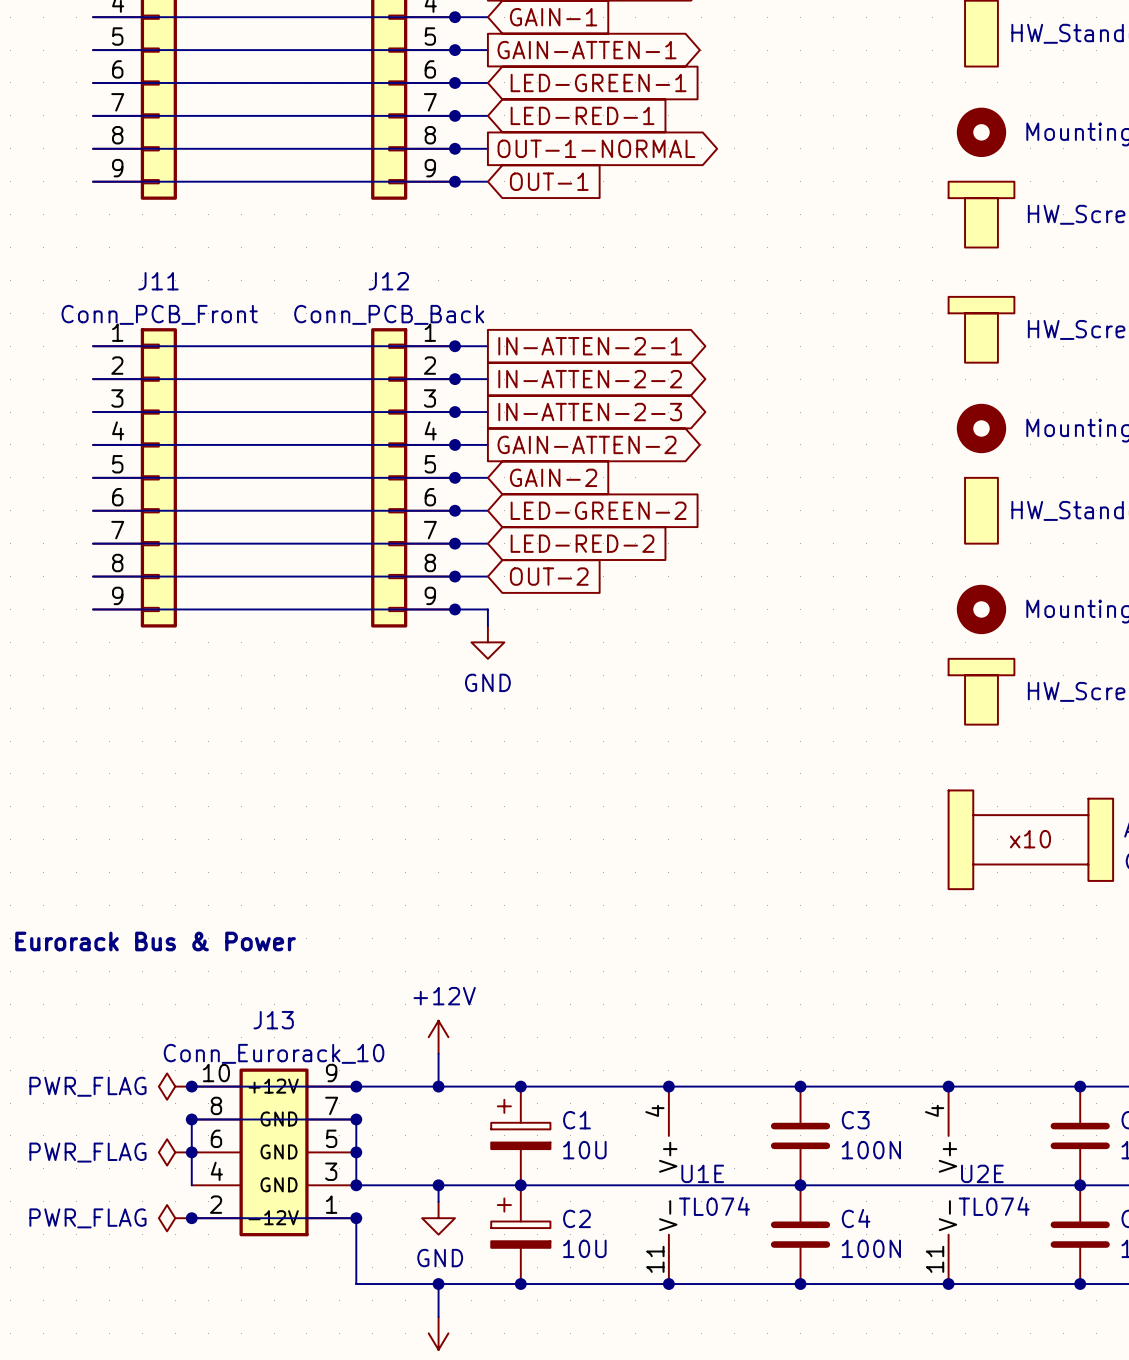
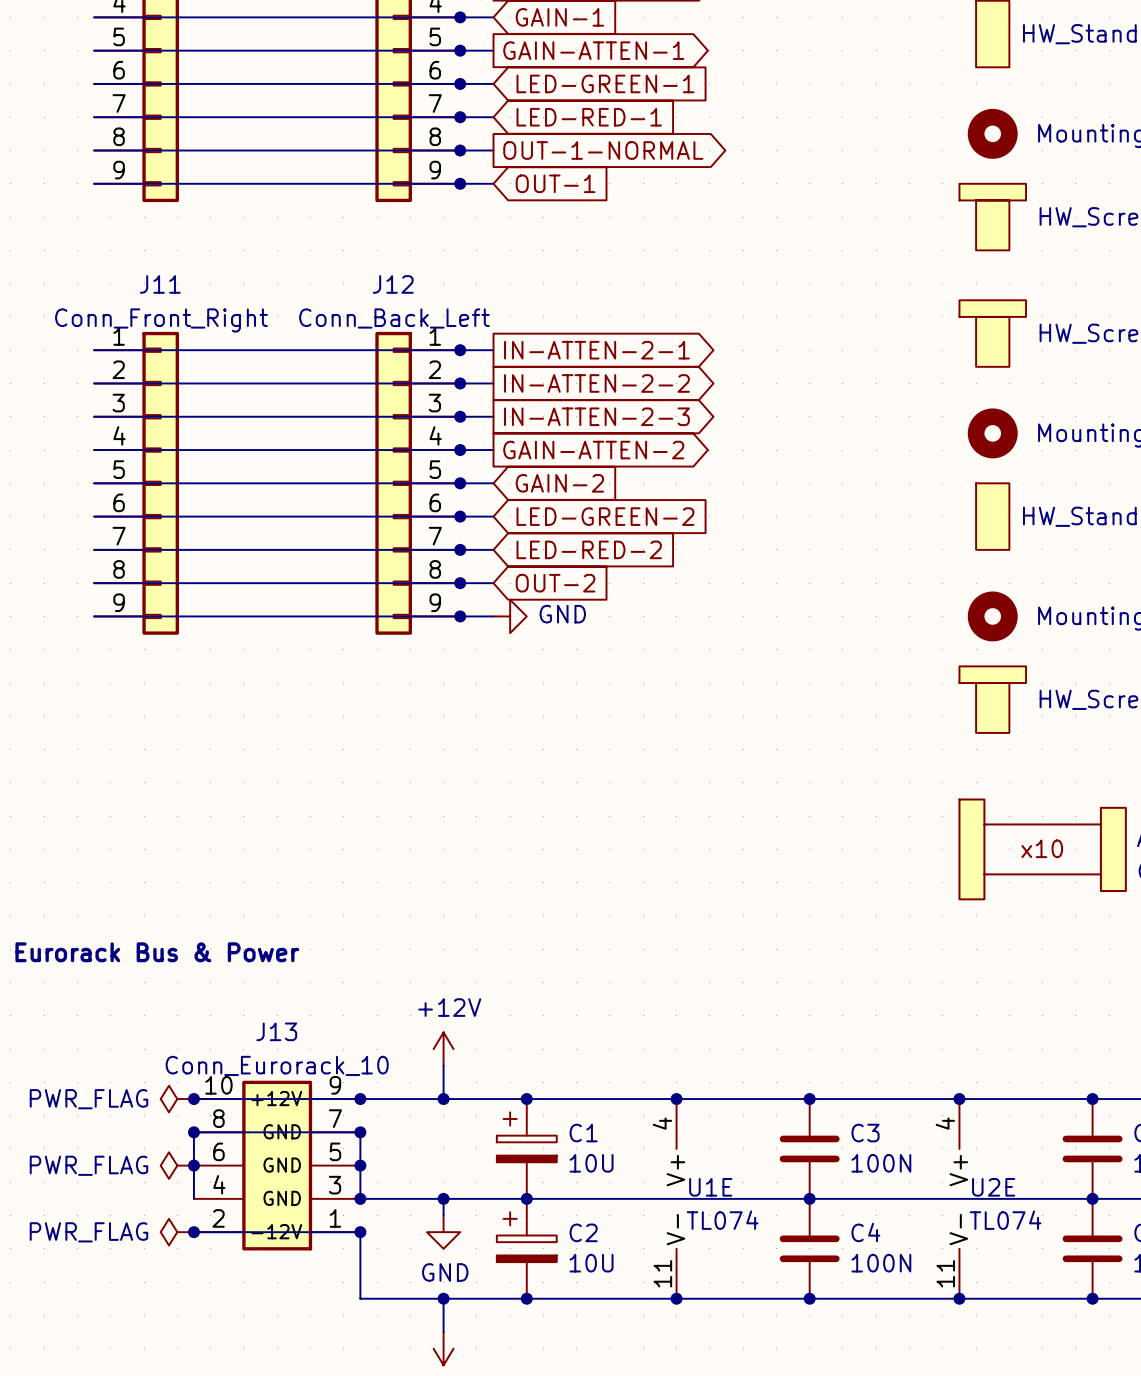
J11 value: Conn_PCB_Front (159, 314) -> Conn_Front_Right (161, 320)
J12 value: Conn_PCB_Back (389, 314) -> Conn_Back_Left (394, 318)
wire: (487, 609) (487, 625) -> none
power symbol rotation: 0° (487, 642) -> 90° counterclockwise (510, 616)
power symbol position: GND (487, 642) -> GND (510, 616)

